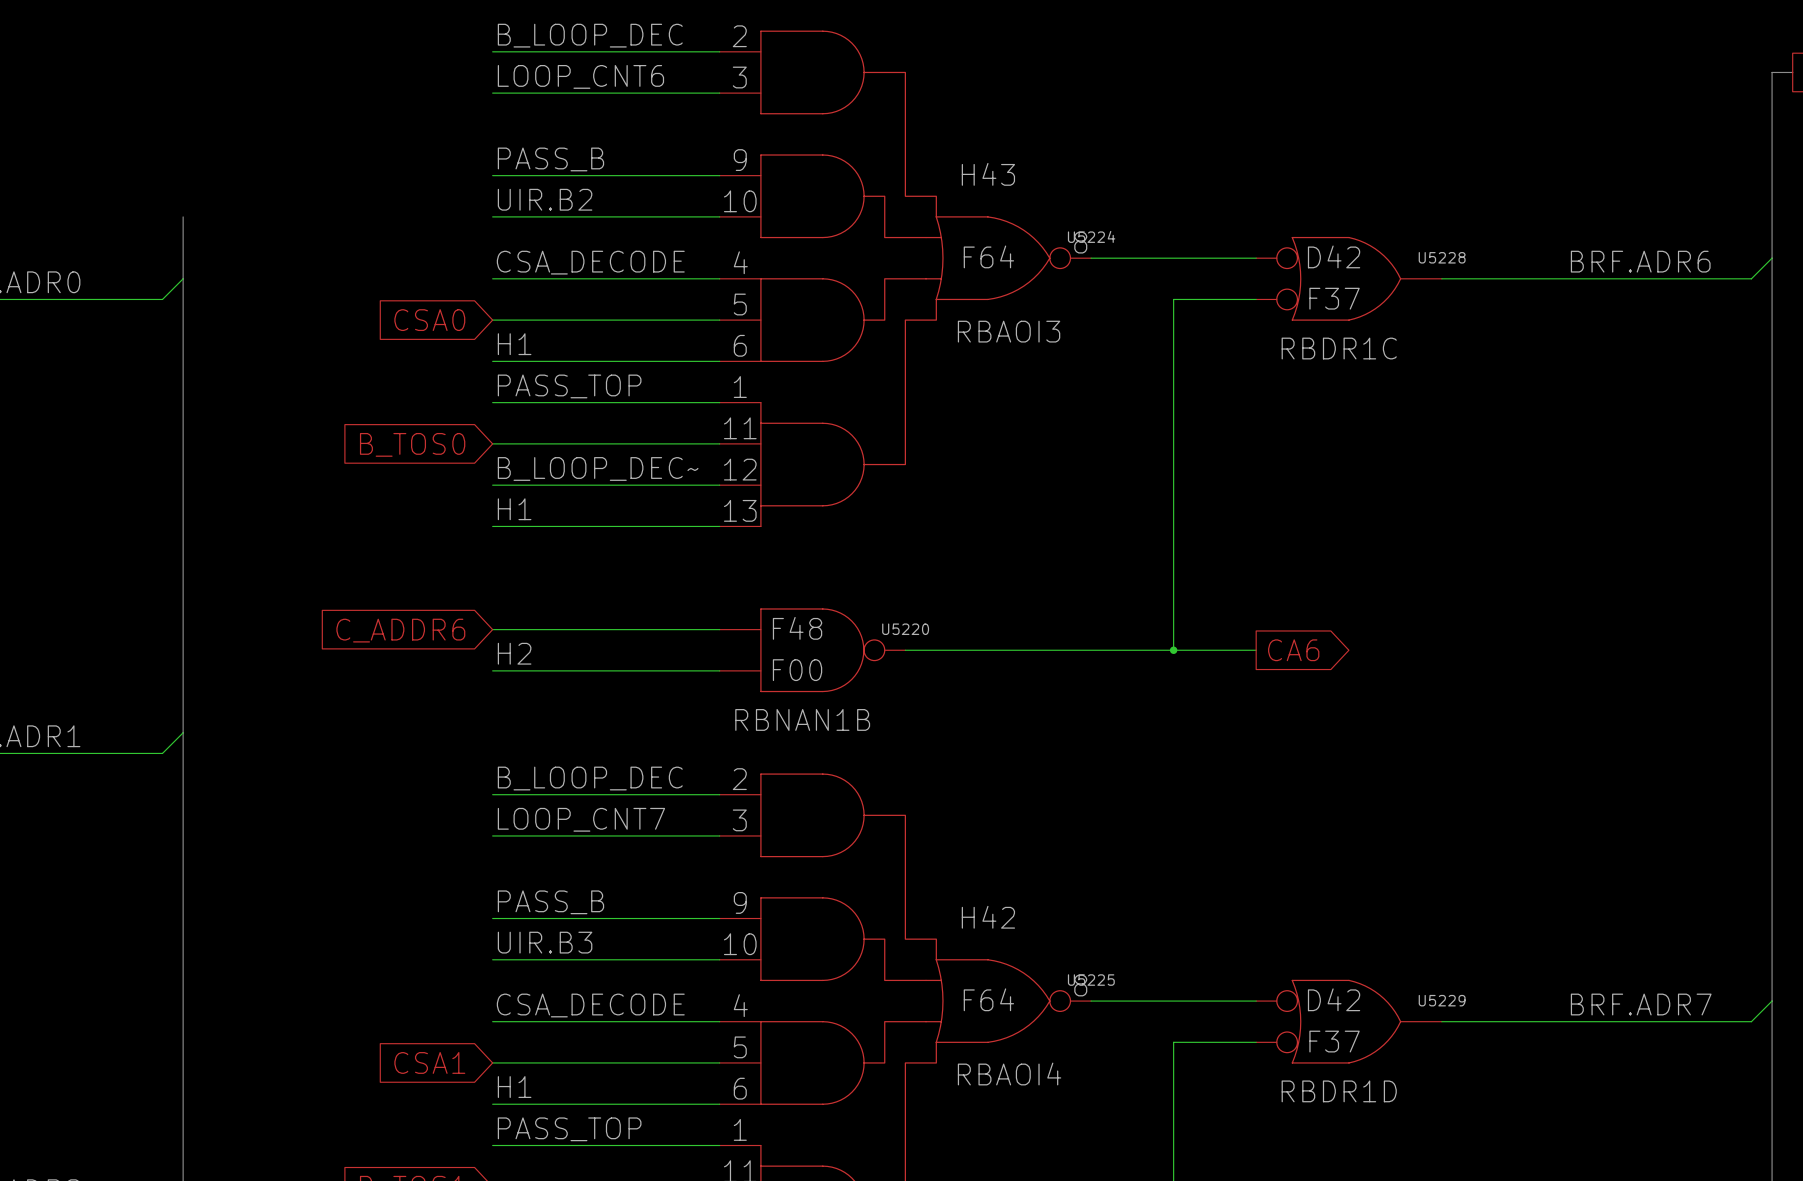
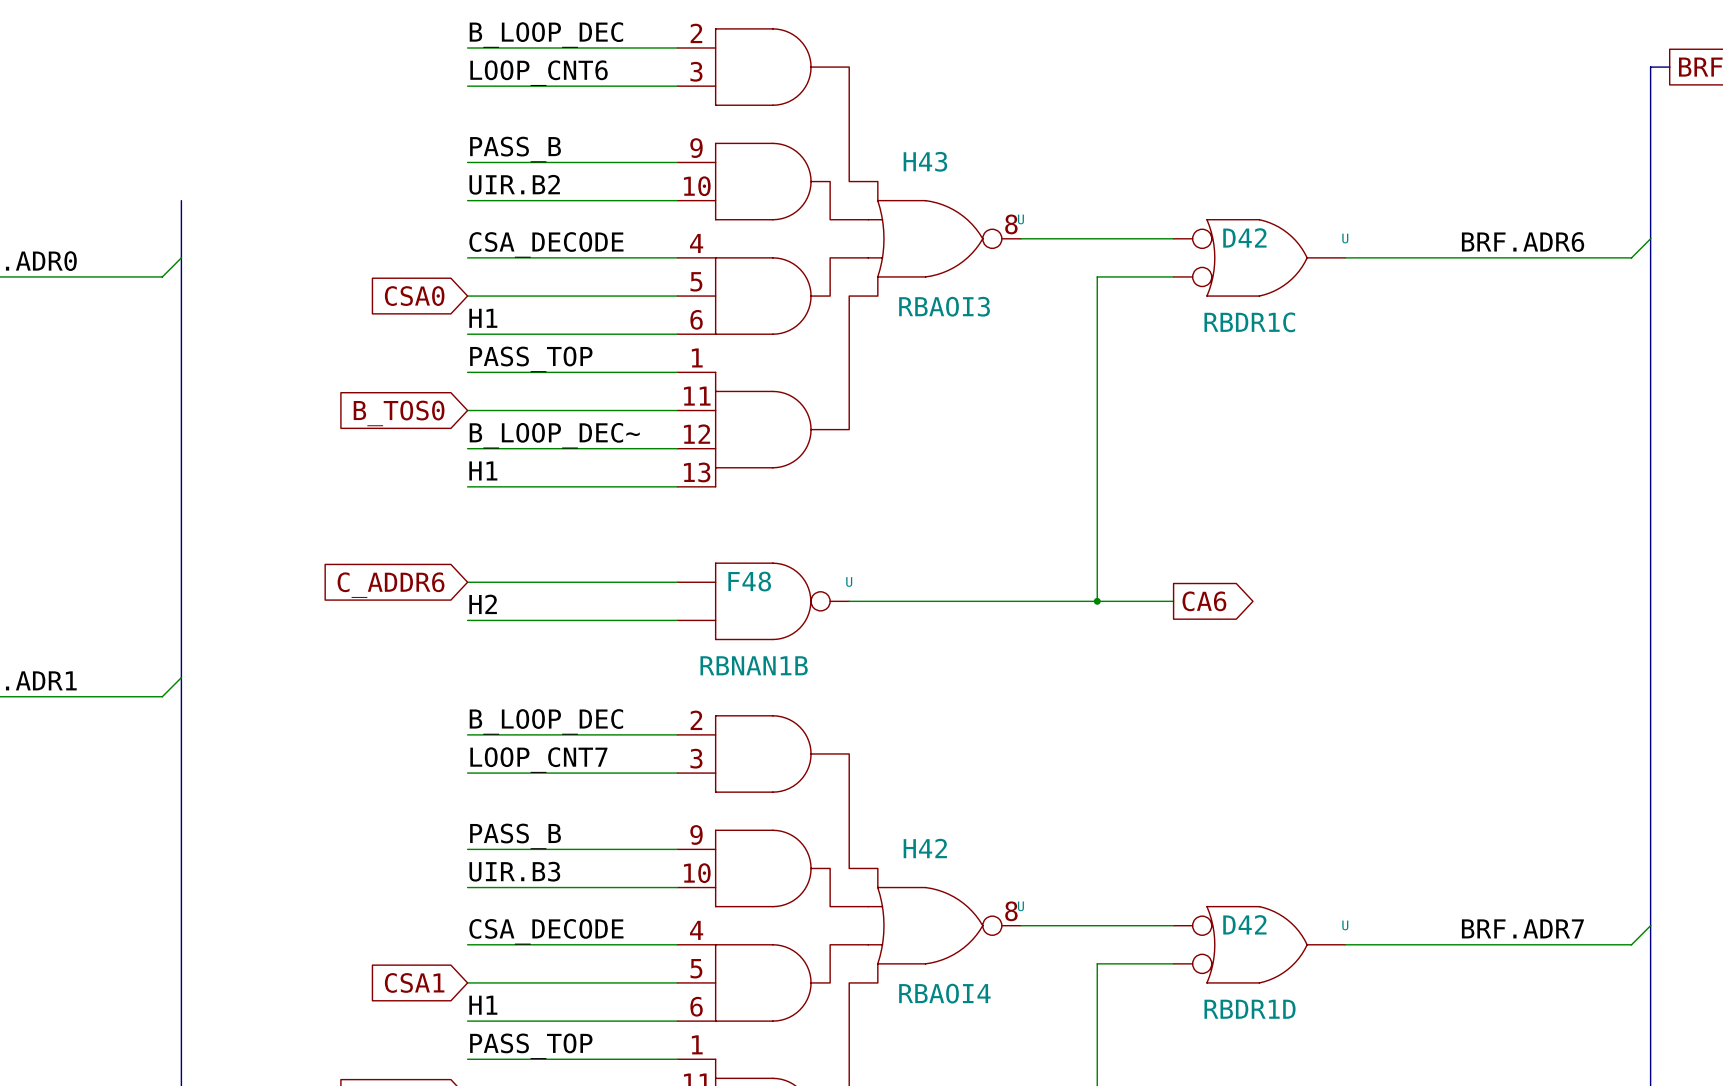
U5224 name: U5224 (1091, 236) -> U (1020, 219)
U5224 value: F64 (988, 256) -> none
U5228 name: U5228 (1442, 257) -> U (1345, 238)
U5228 value: F37 (1334, 298) -> none
U5220 name: U5220 (905, 629) -> U (849, 581)
U5220 value: F00 (797, 670) -> none
U5225 name: U5225 (1091, 980) -> U (1020, 906)
U5225 value: F64 (988, 999) -> none
U5229 name: U5229 (1442, 1000) -> U (1345, 925)
U5229 value: F37 (1334, 1041) -> none

